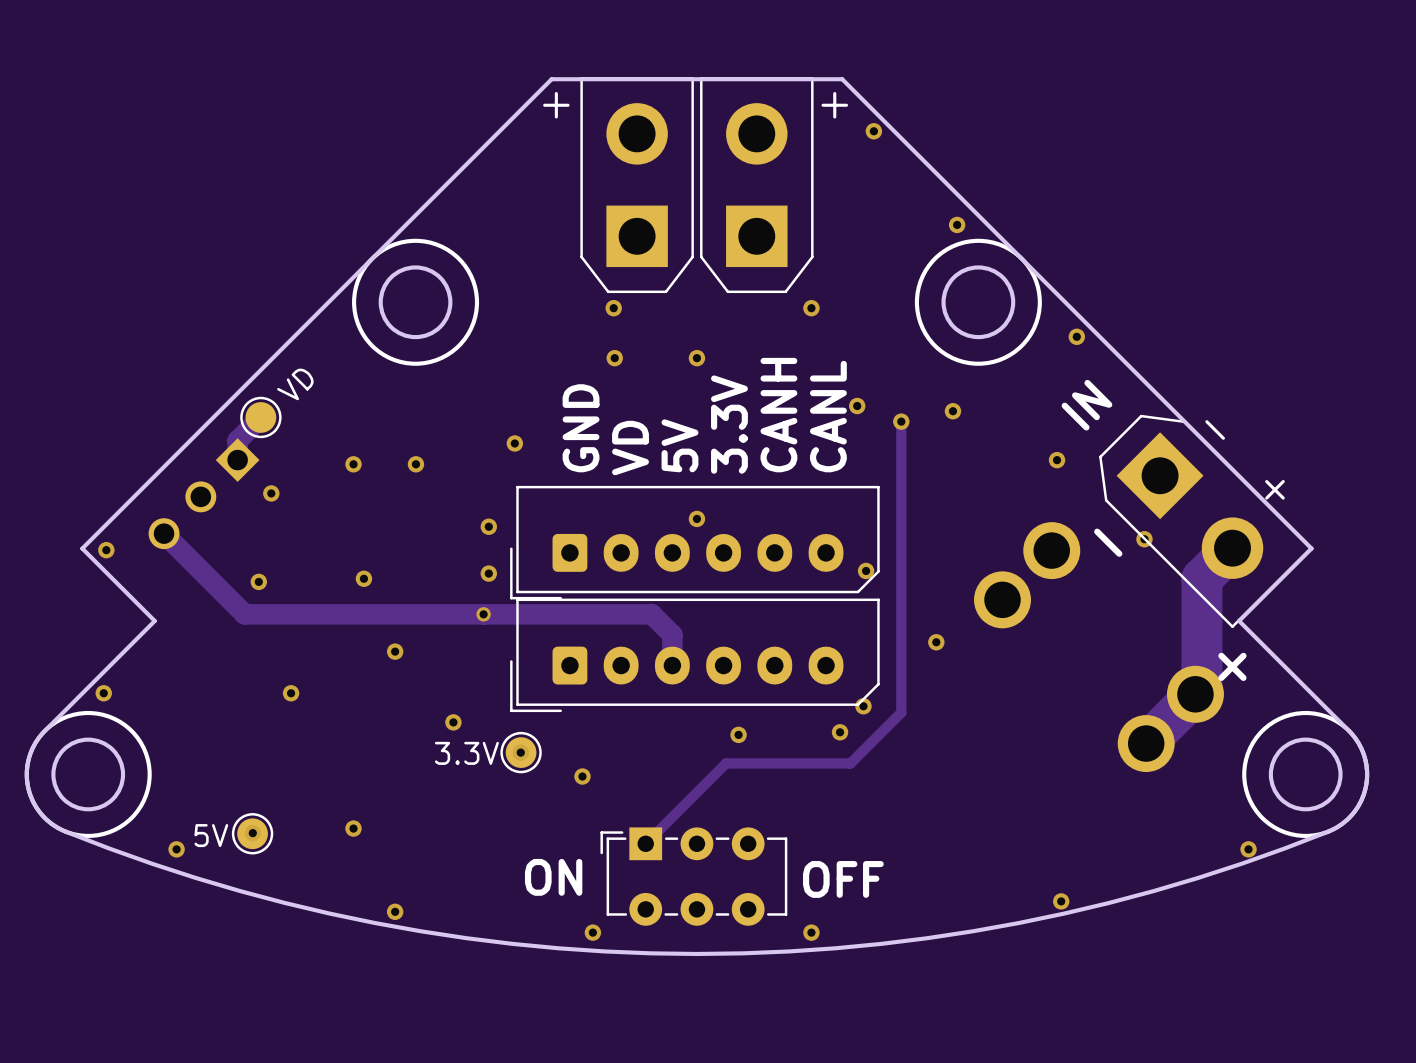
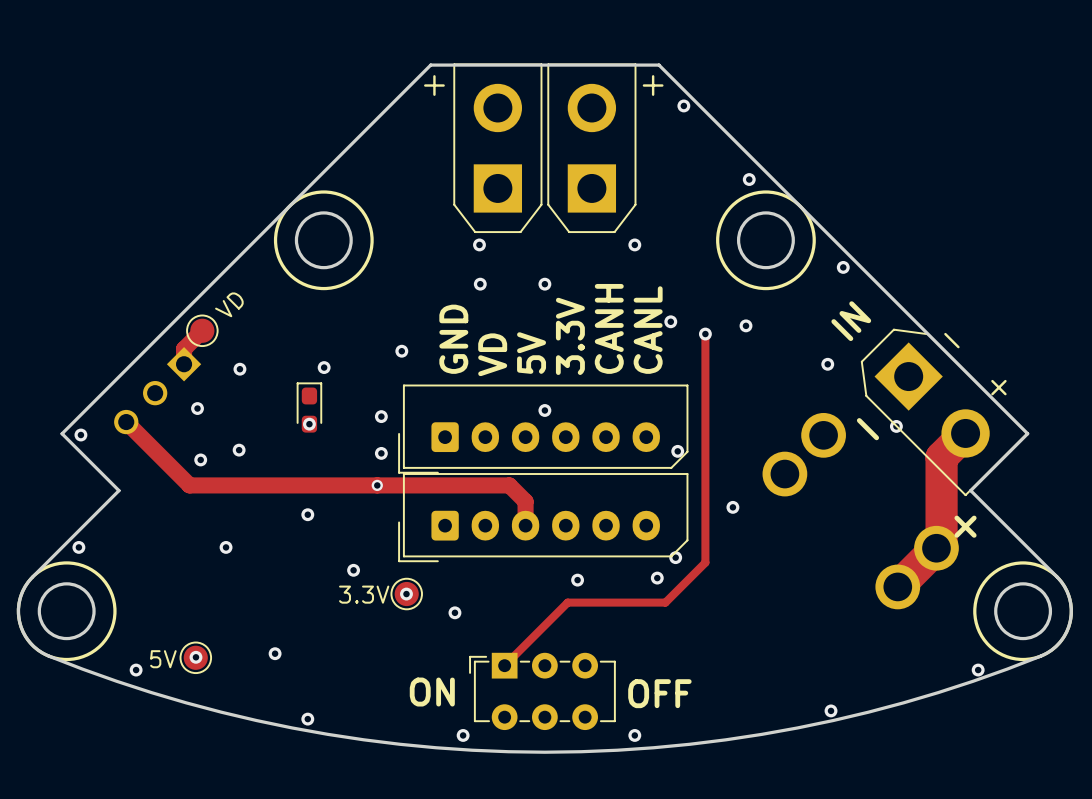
via: (353, 464) -> none
via: none -> (239, 369)
via: (271, 493) -> none
part: none -> (309, 407)
via: none -> (197, 408)
via: none -> (309, 424)
via: none -> (239, 450)
via: (363, 578) -> none

